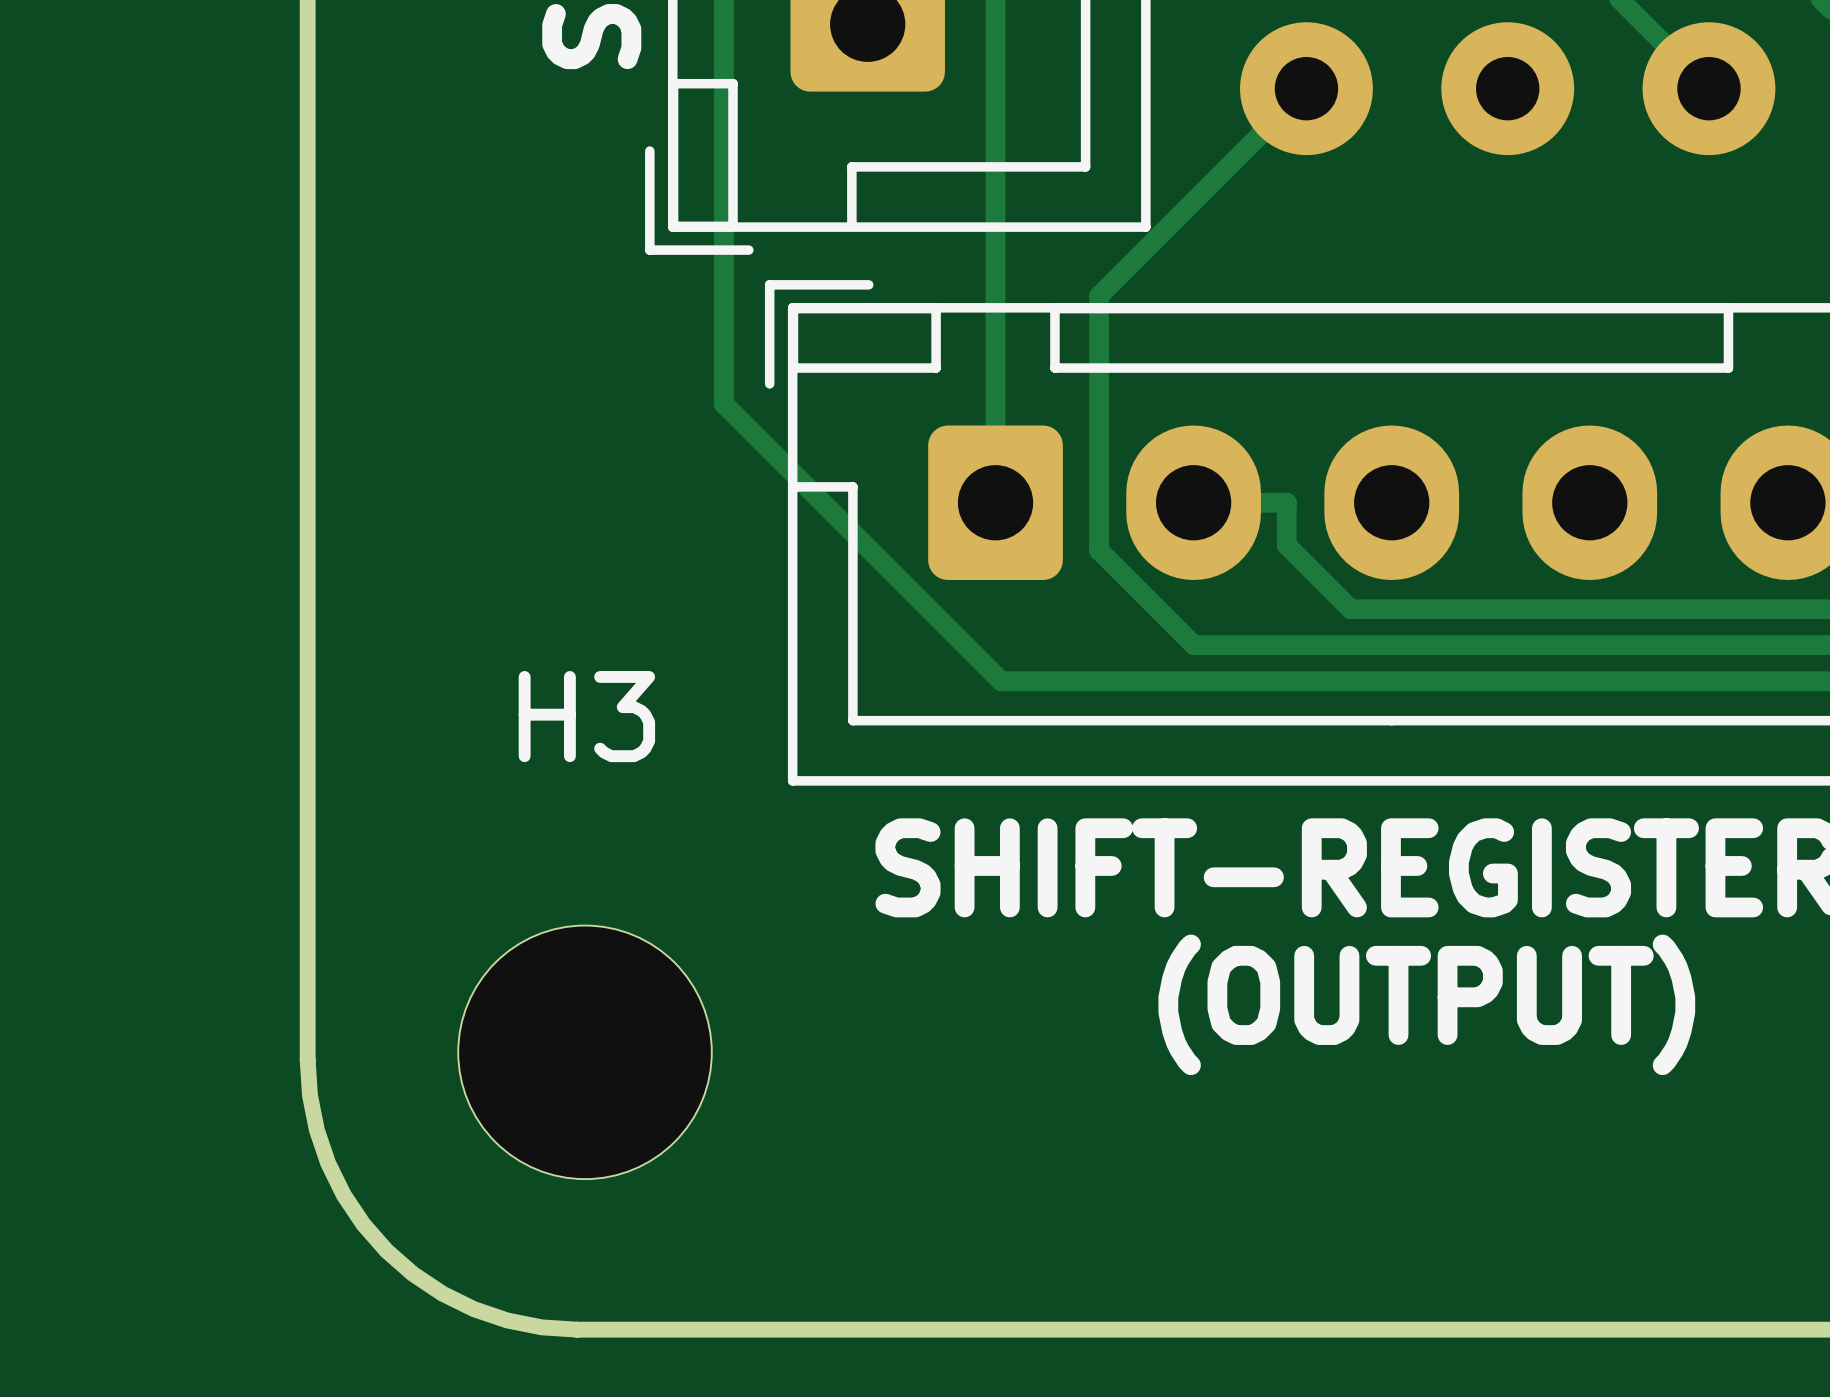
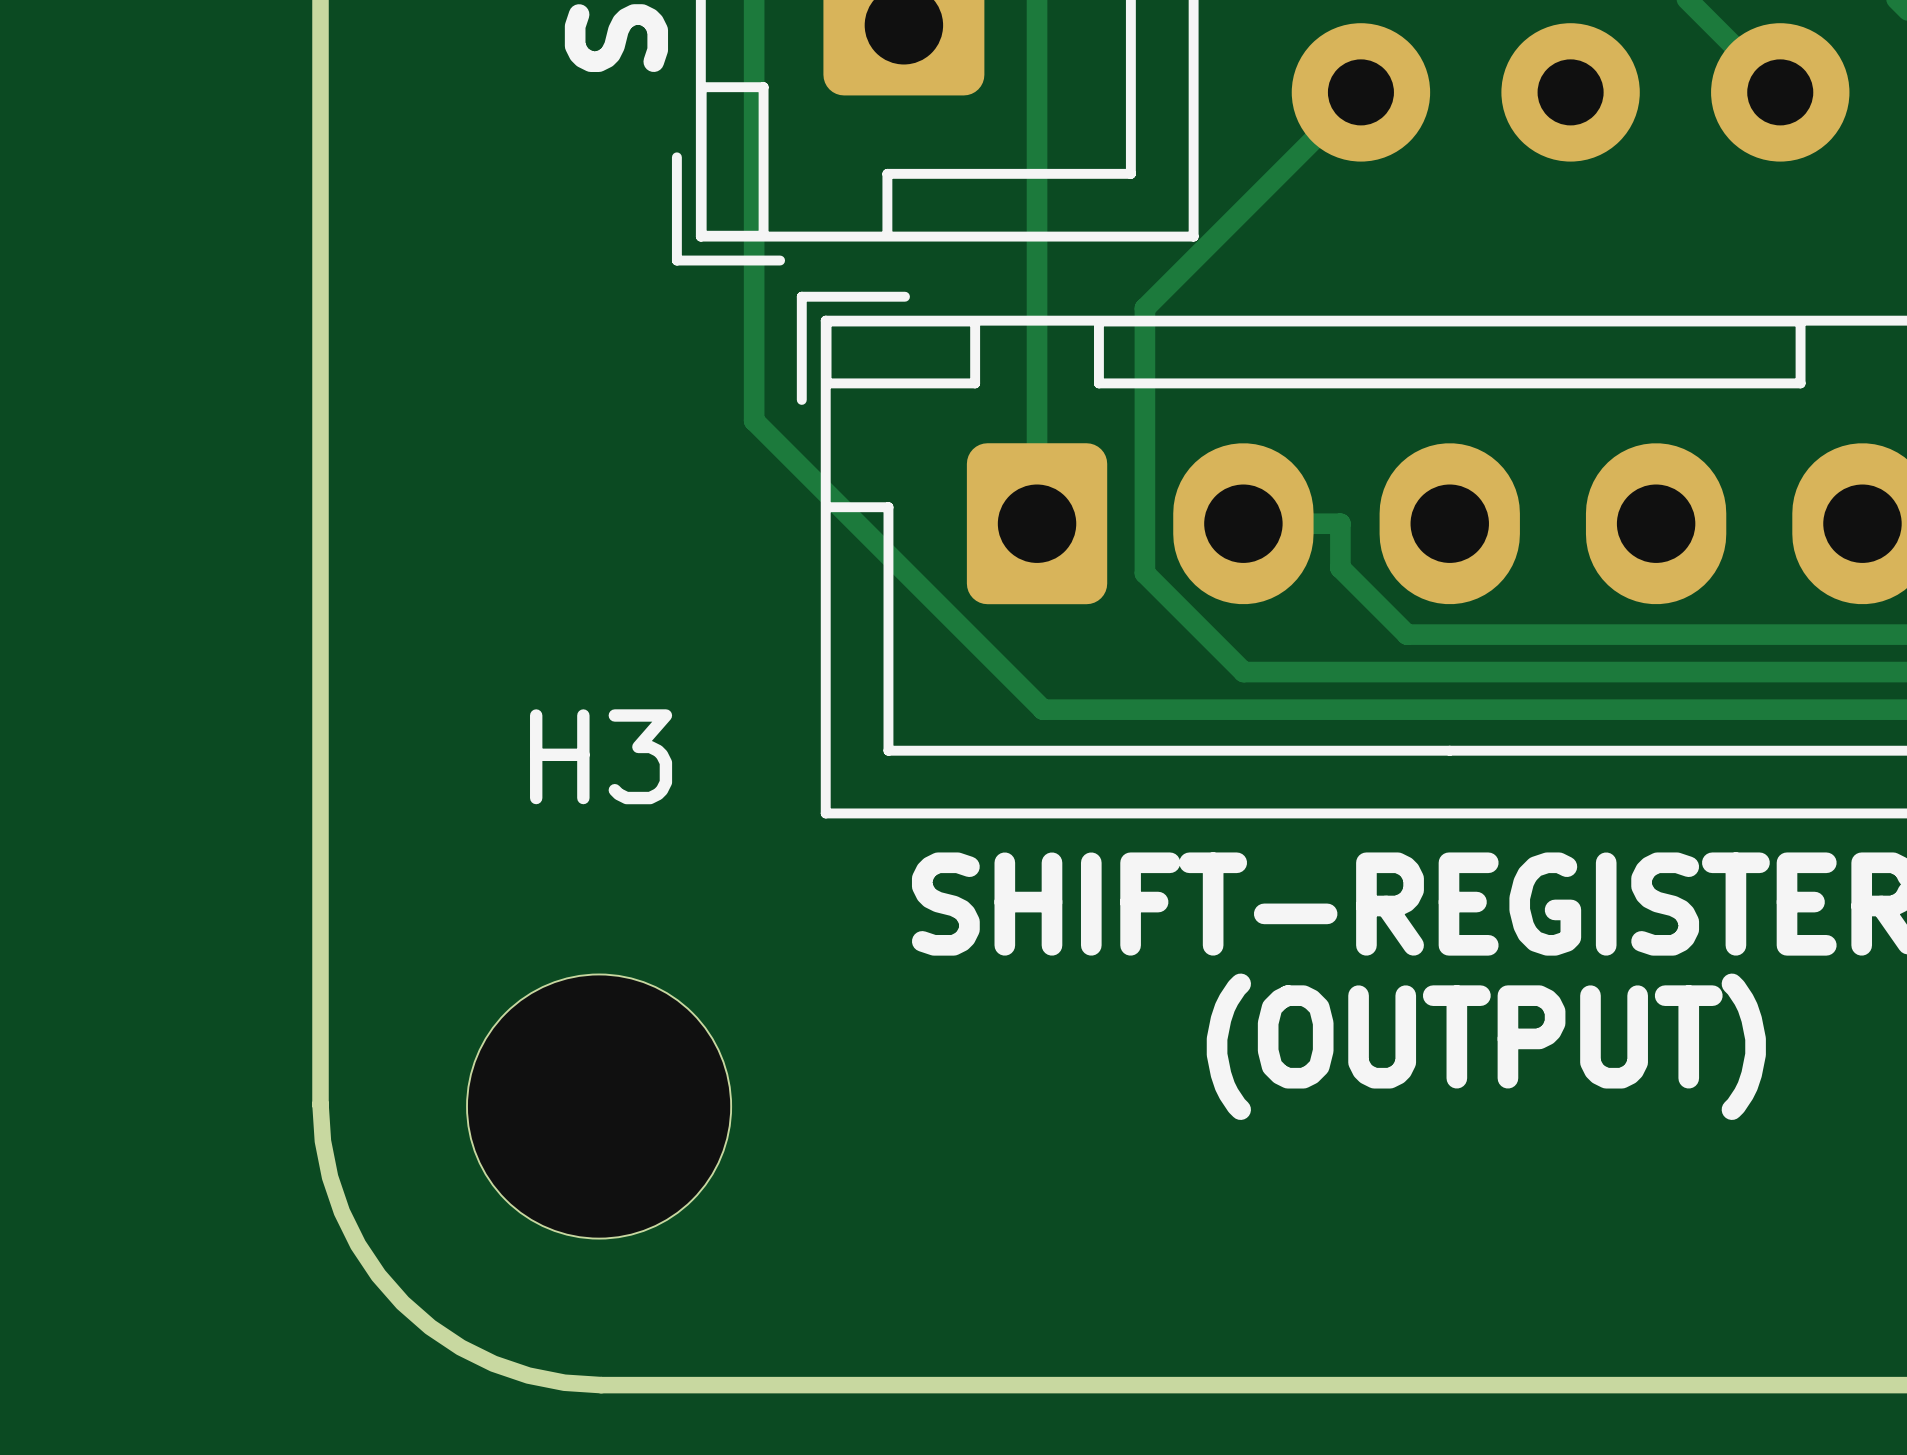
H3 position: (585, 1052) -> (599, 1106)

